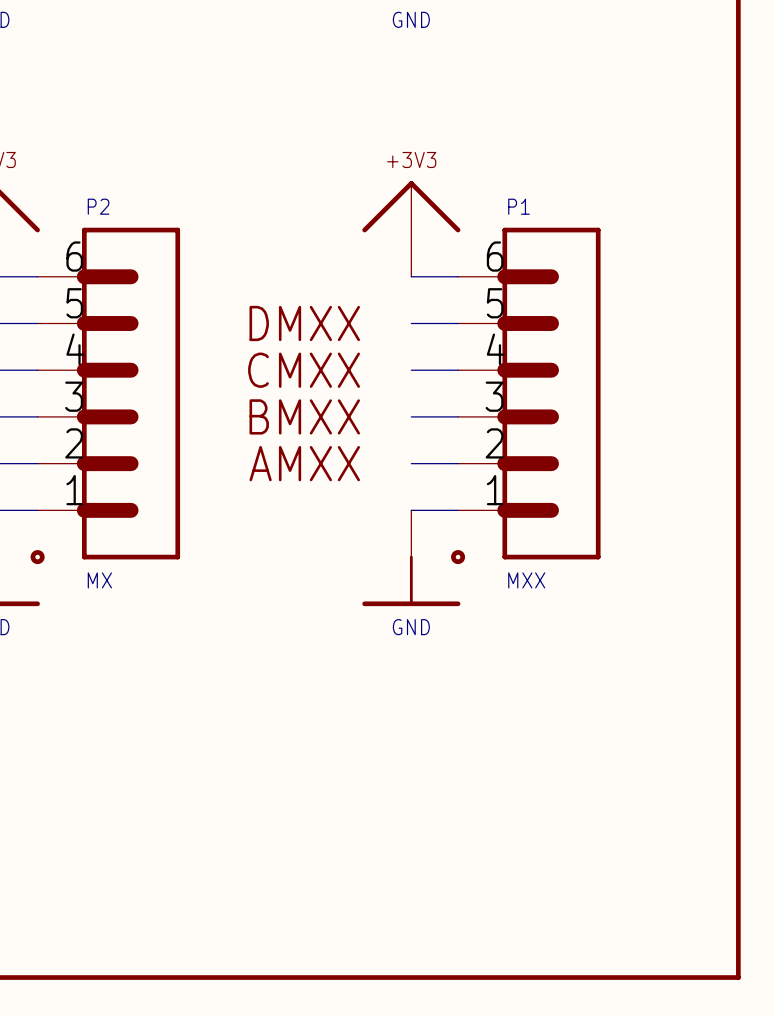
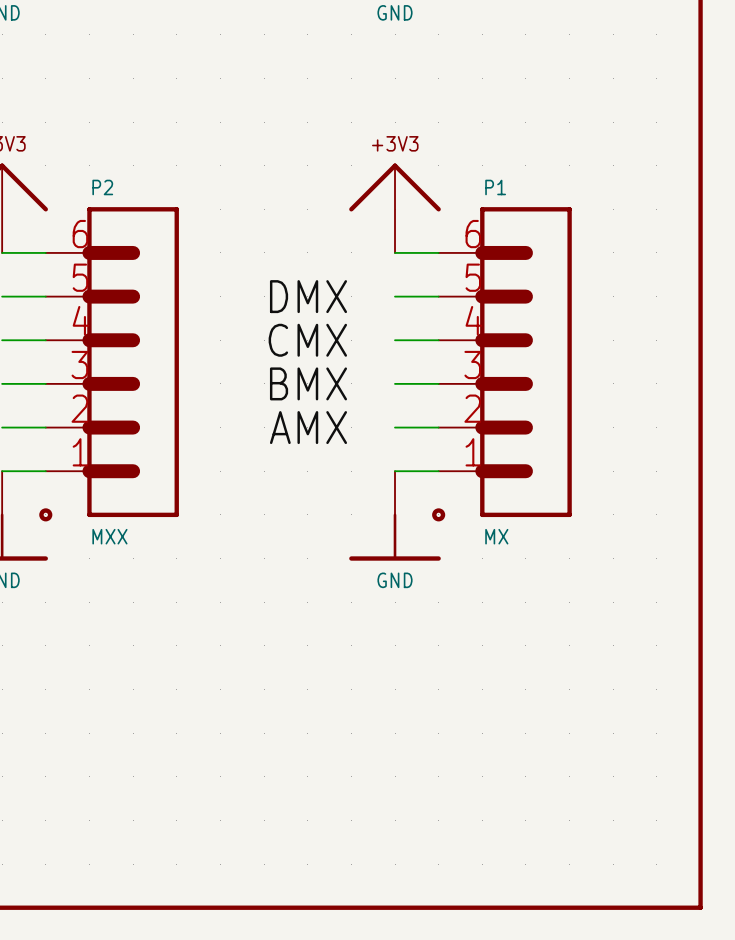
label: DMXX (304, 323) -> DMX (308, 296)
label: CMXX (304, 370) -> CMX (307, 340)
label: BMXX (304, 416) -> BMX (308, 383)
label: AMXX (304, 463) -> AMX (308, 427)
P2 value: MX (99, 580) -> MXX (109, 536)
P1 value: MXX (526, 580) -> MX (496, 536)

